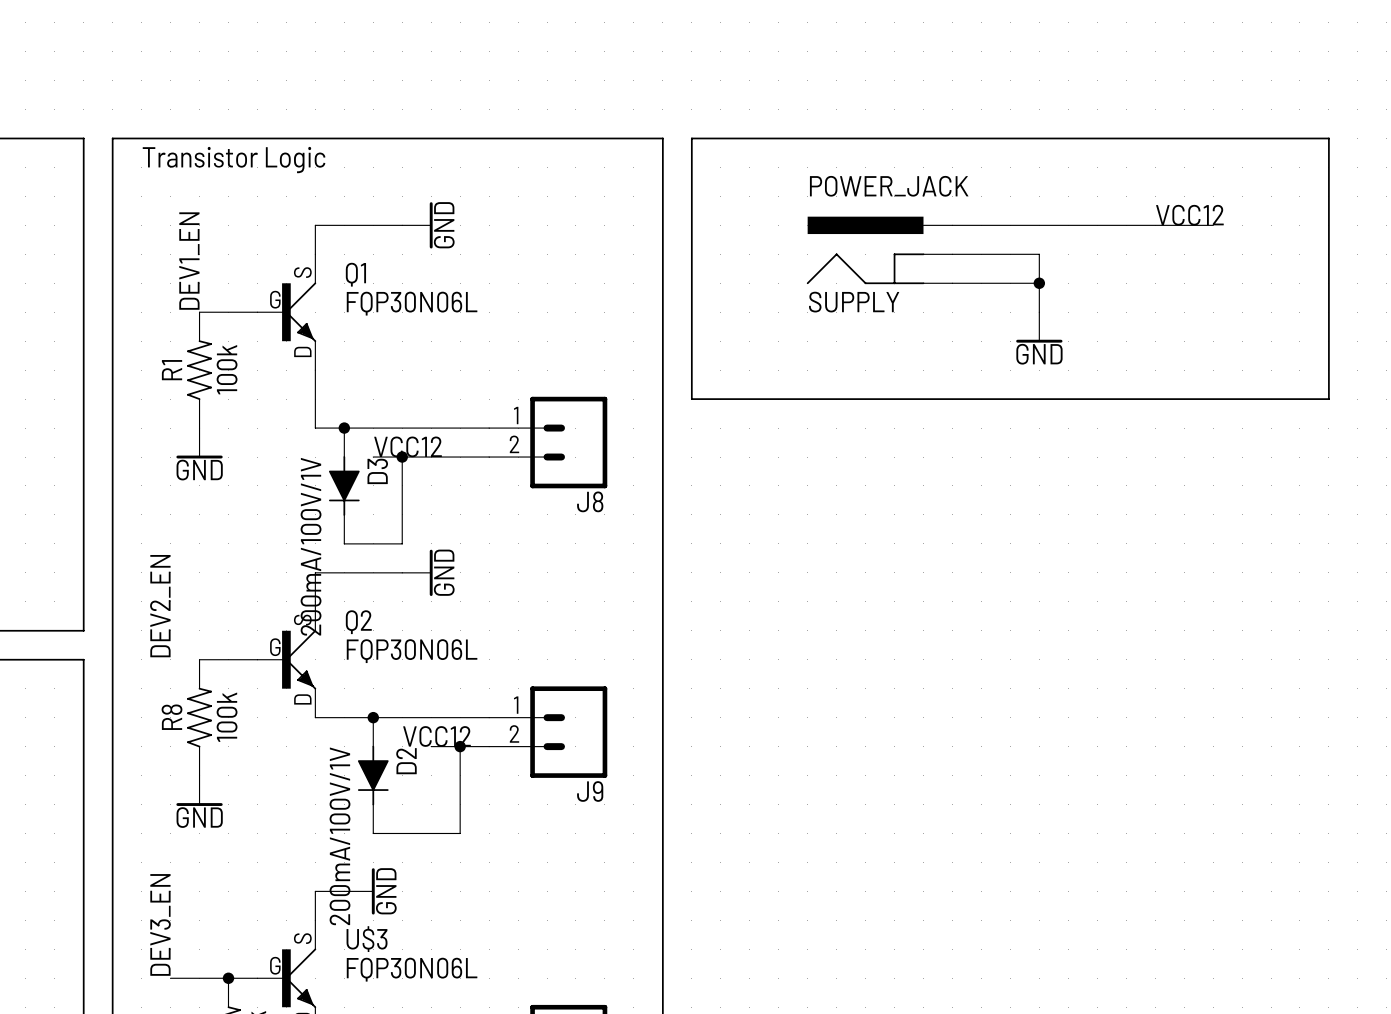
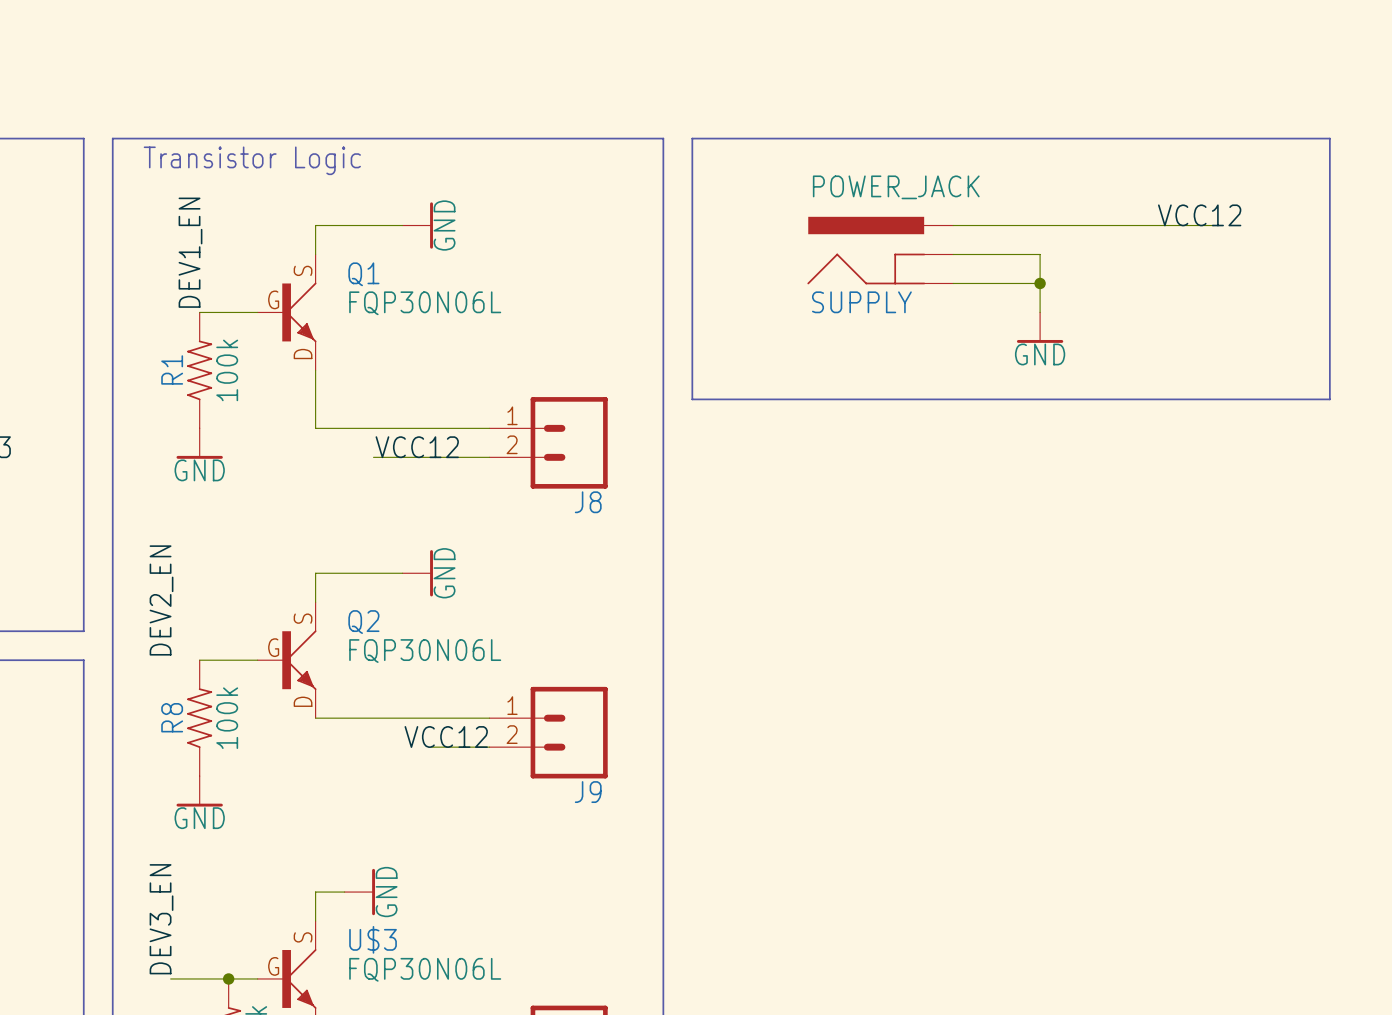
wire: (344, 428) (344, 457) -> none
junction: (344, 428) -> none
wire: (402, 457) (402, 543) (344, 543) (344, 514) -> none
junction: (402, 457) -> none
D3: 200mA/100V/1V (344, 485) -> none
wire: (373, 717) (373, 746) -> none
junction: (373, 717) -> none
wire: (460, 746) (460, 833) (373, 833) (373, 804) -> none
junction: (460, 746) -> none
D2: 200mA/100V/1V (373, 775) -> none

